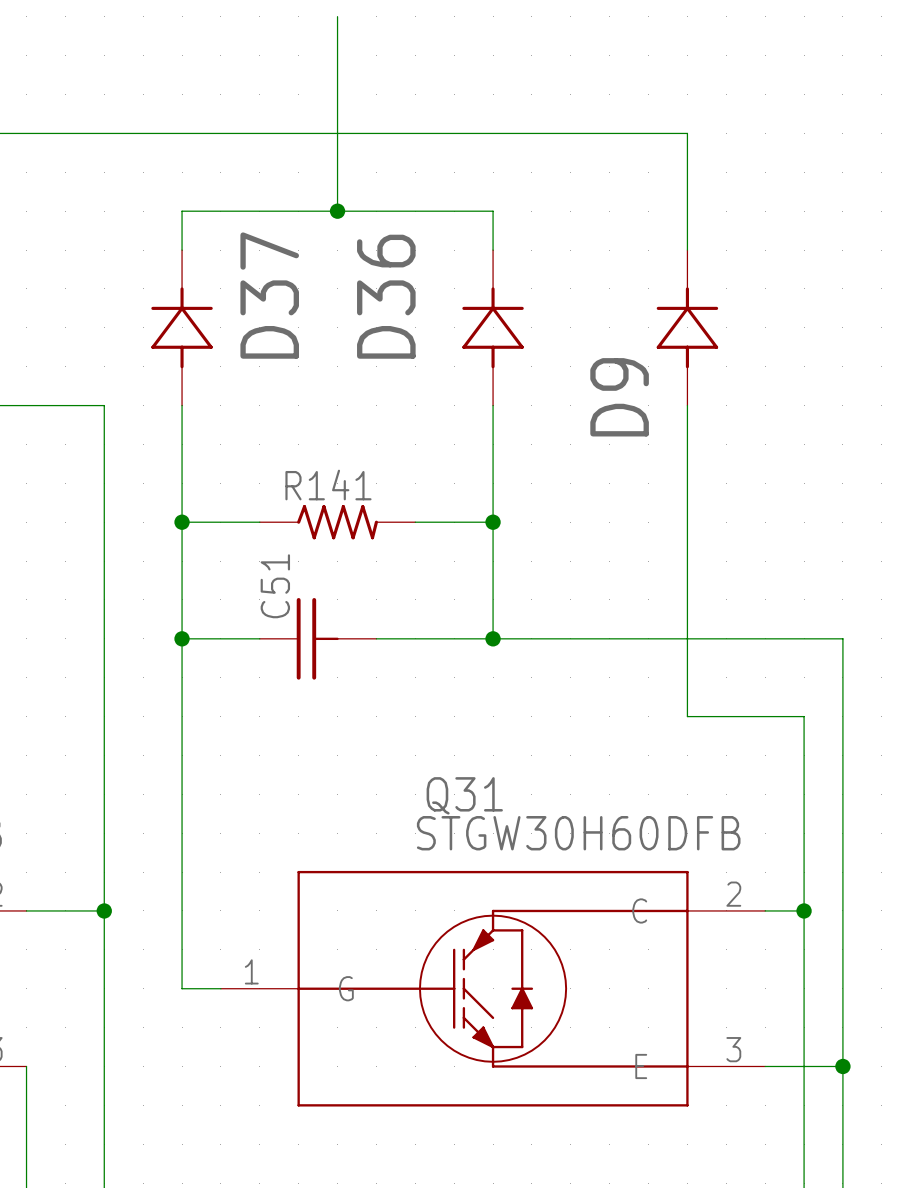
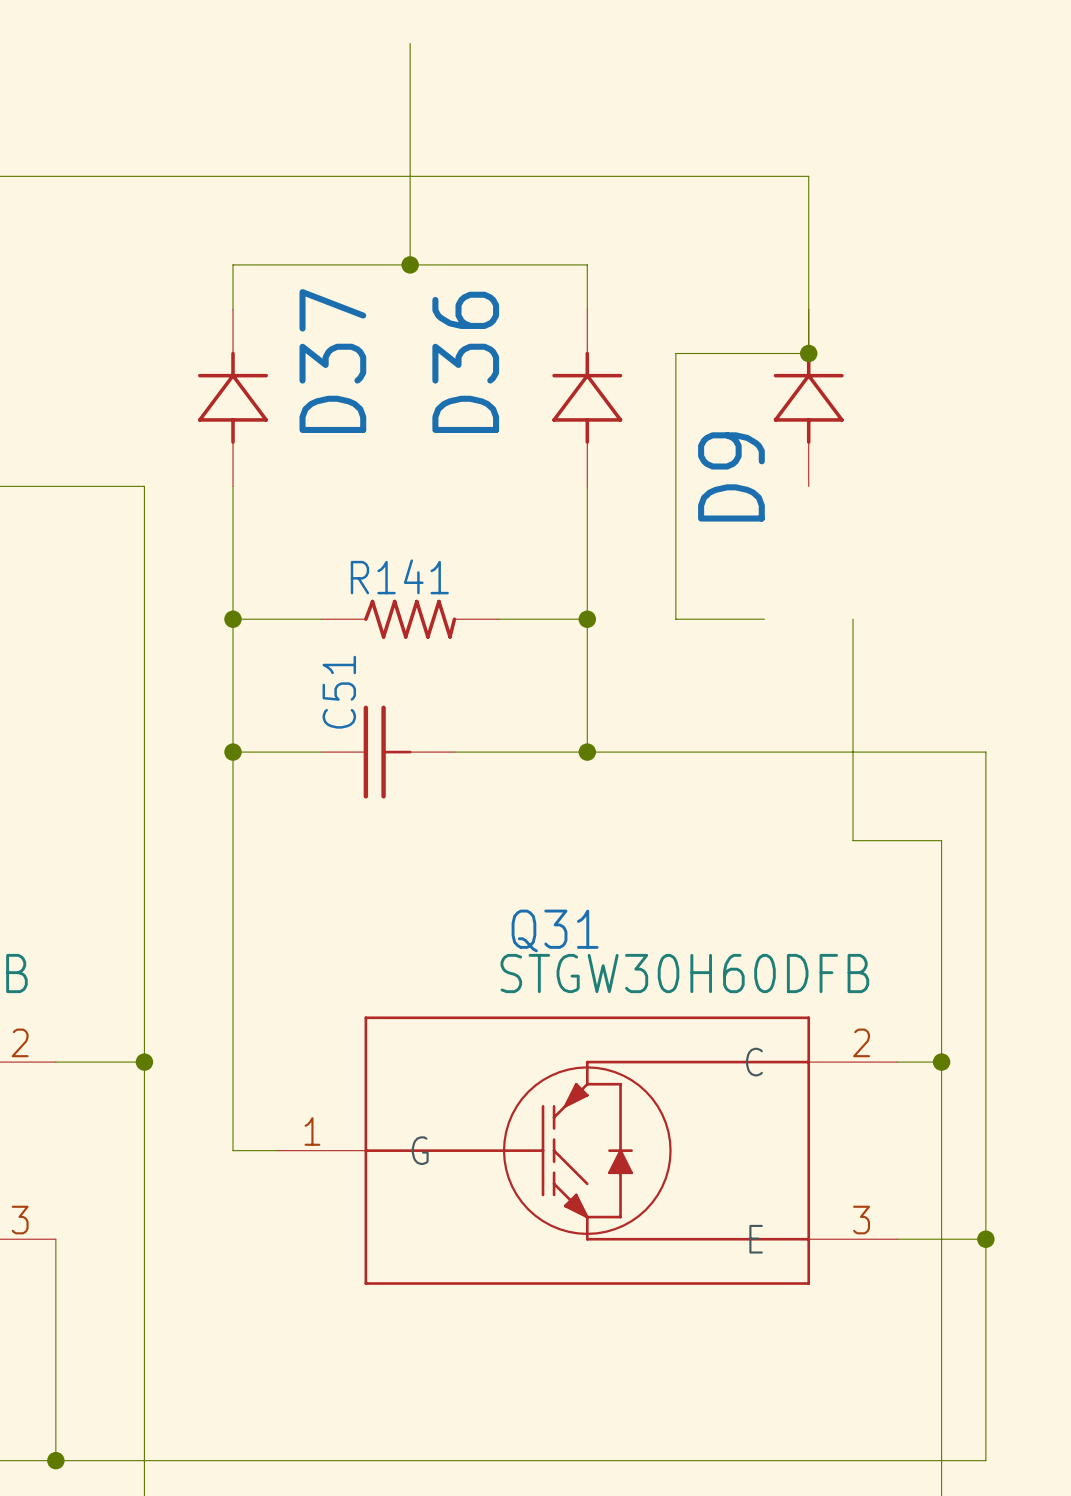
wire: none -> (808, 309) (808, 353) (675, 353) (675, 619) (764, 619)
junction: none -> (808, 353)
wire: (687, 405) (687, 716) (726, 716) -> (853, 619) (853, 840)

